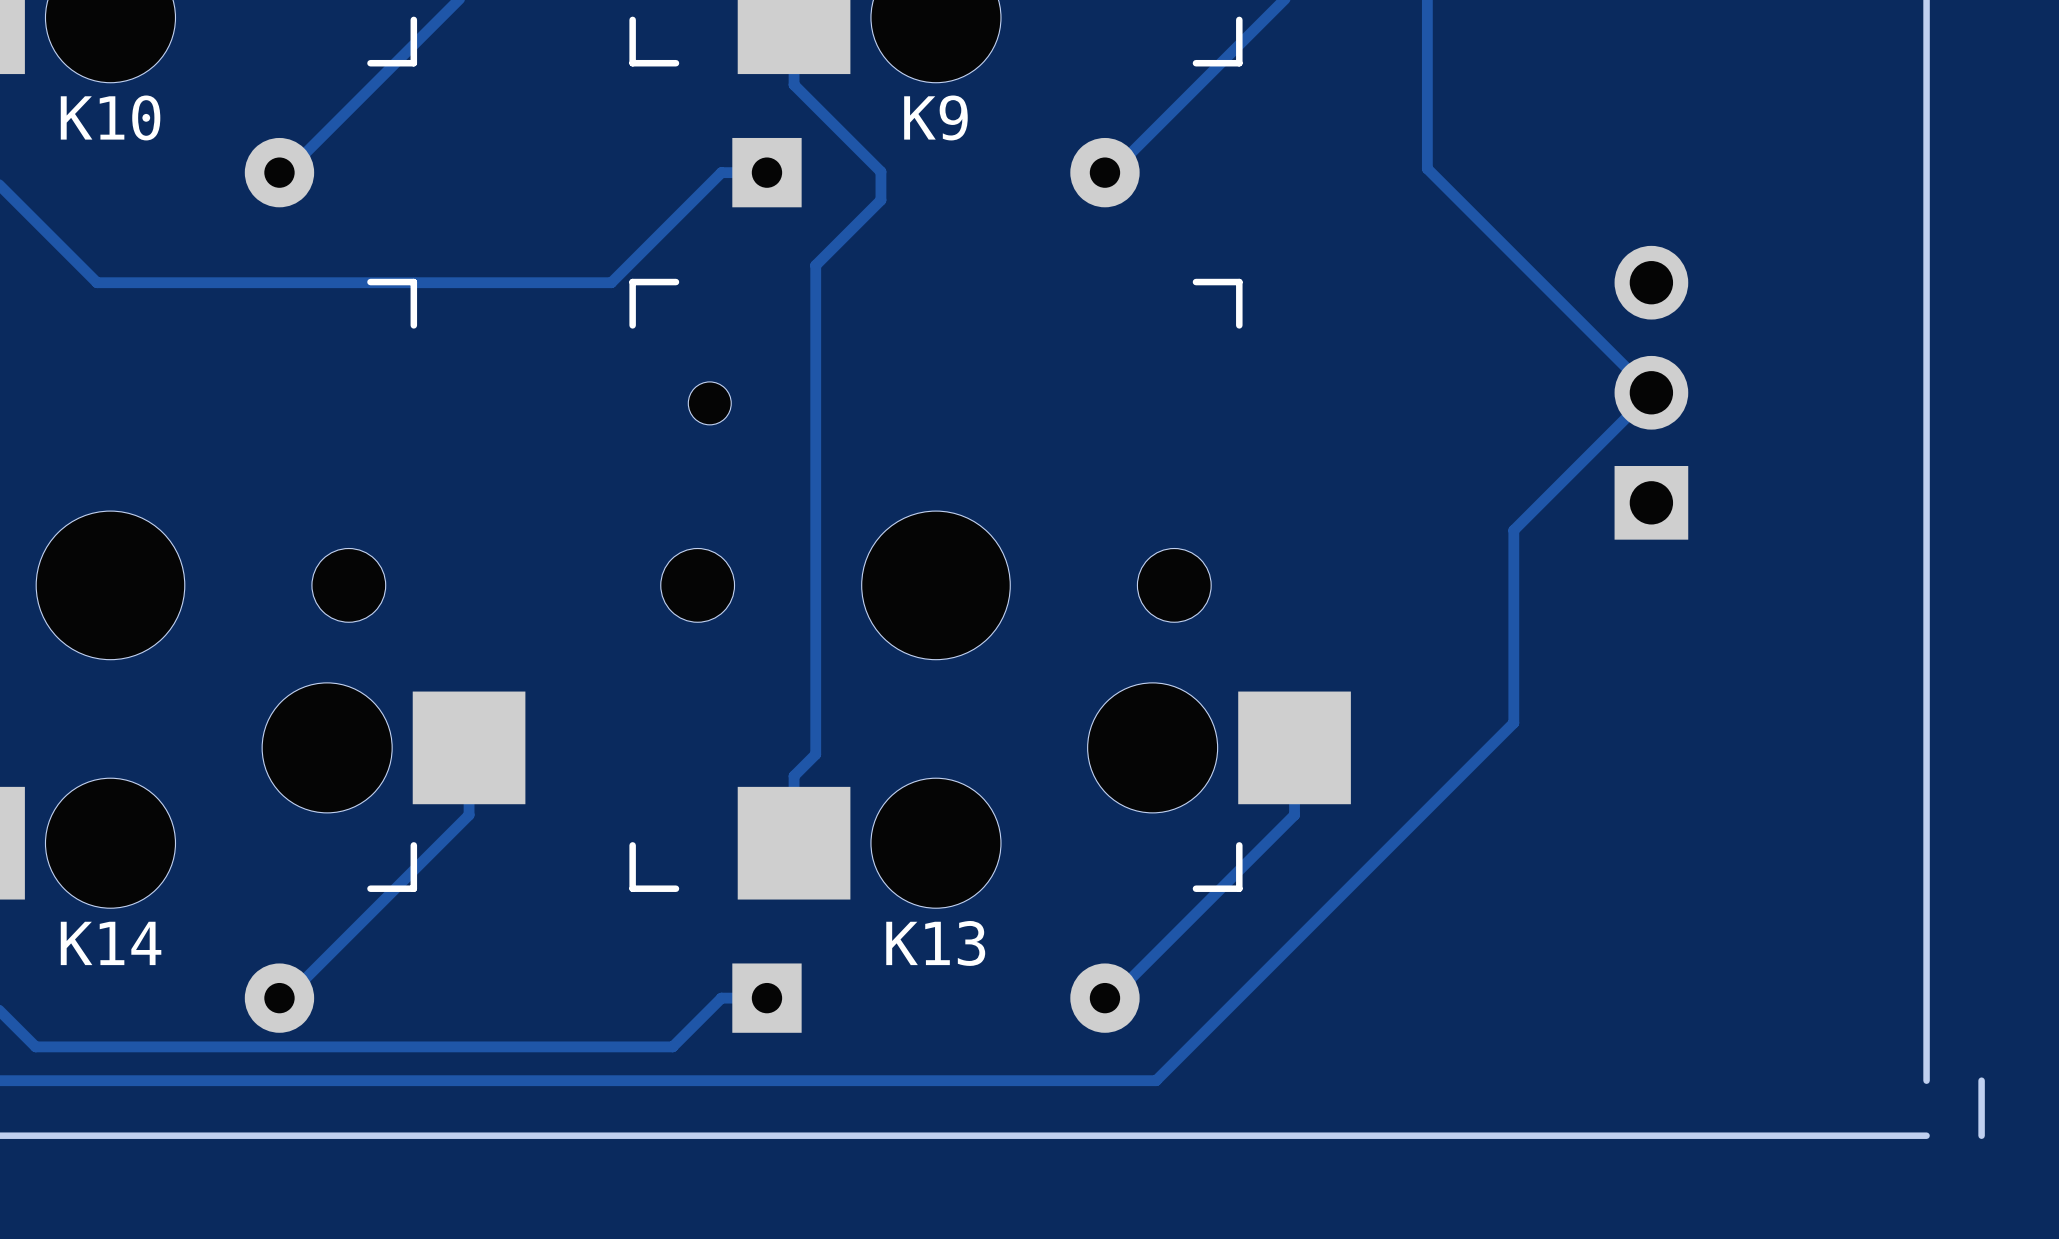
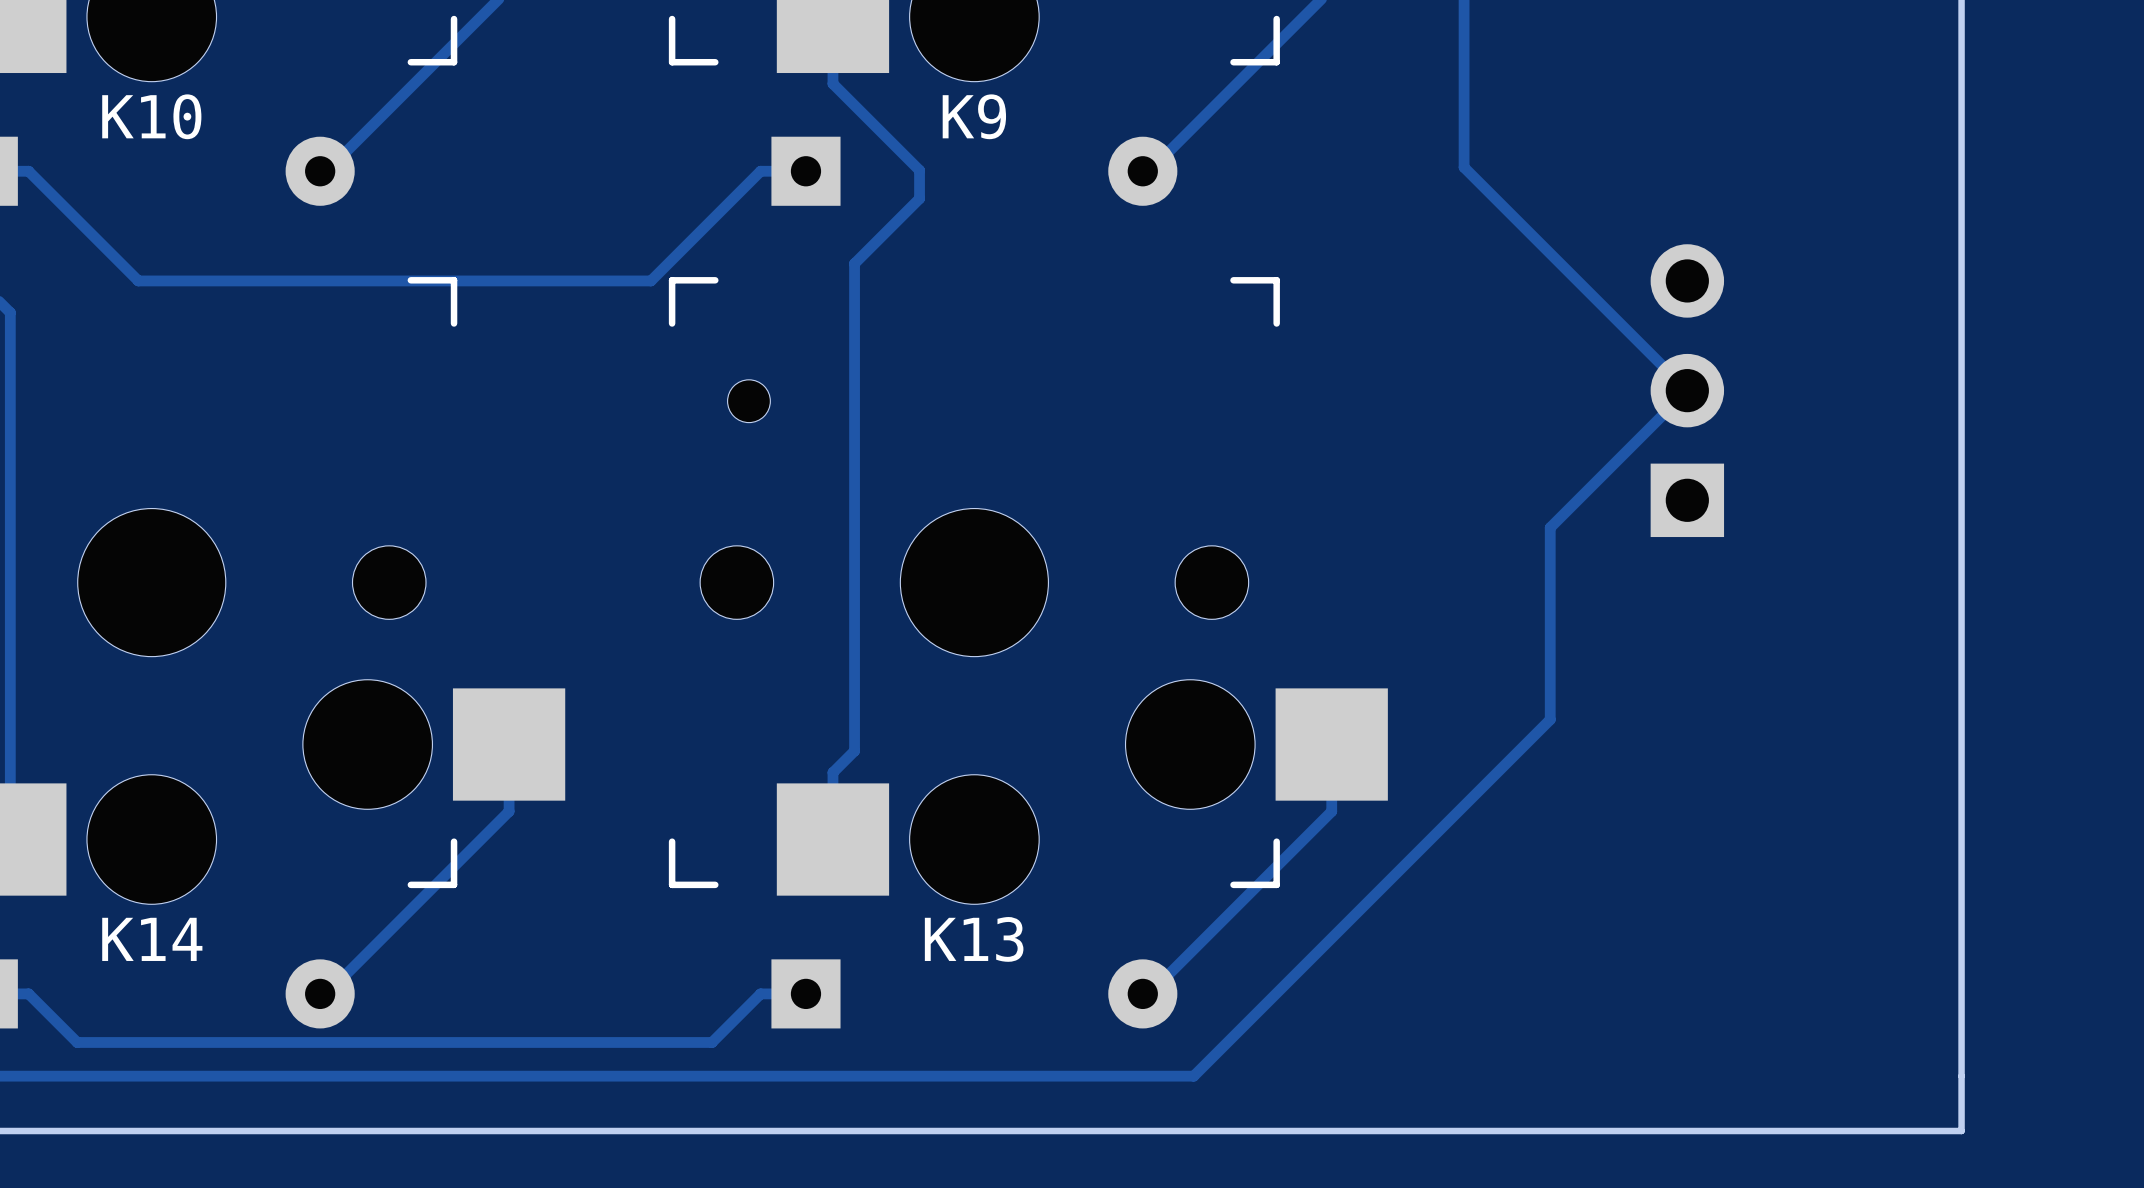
board edge: (1981, 1080) (1981, 1135) -> (1961, 1076) (1961, 1131)

